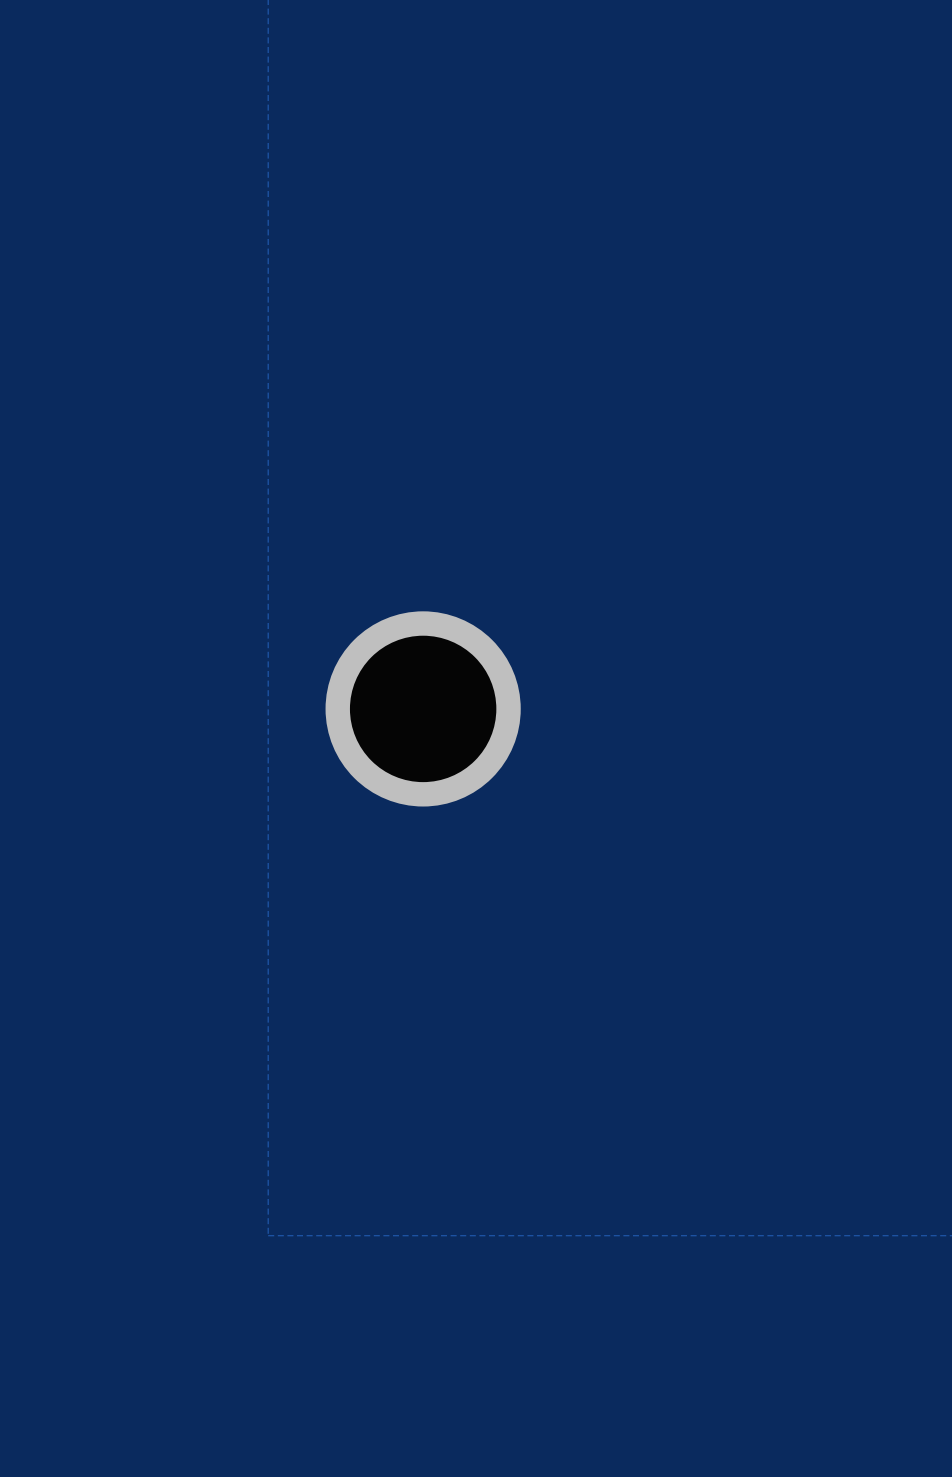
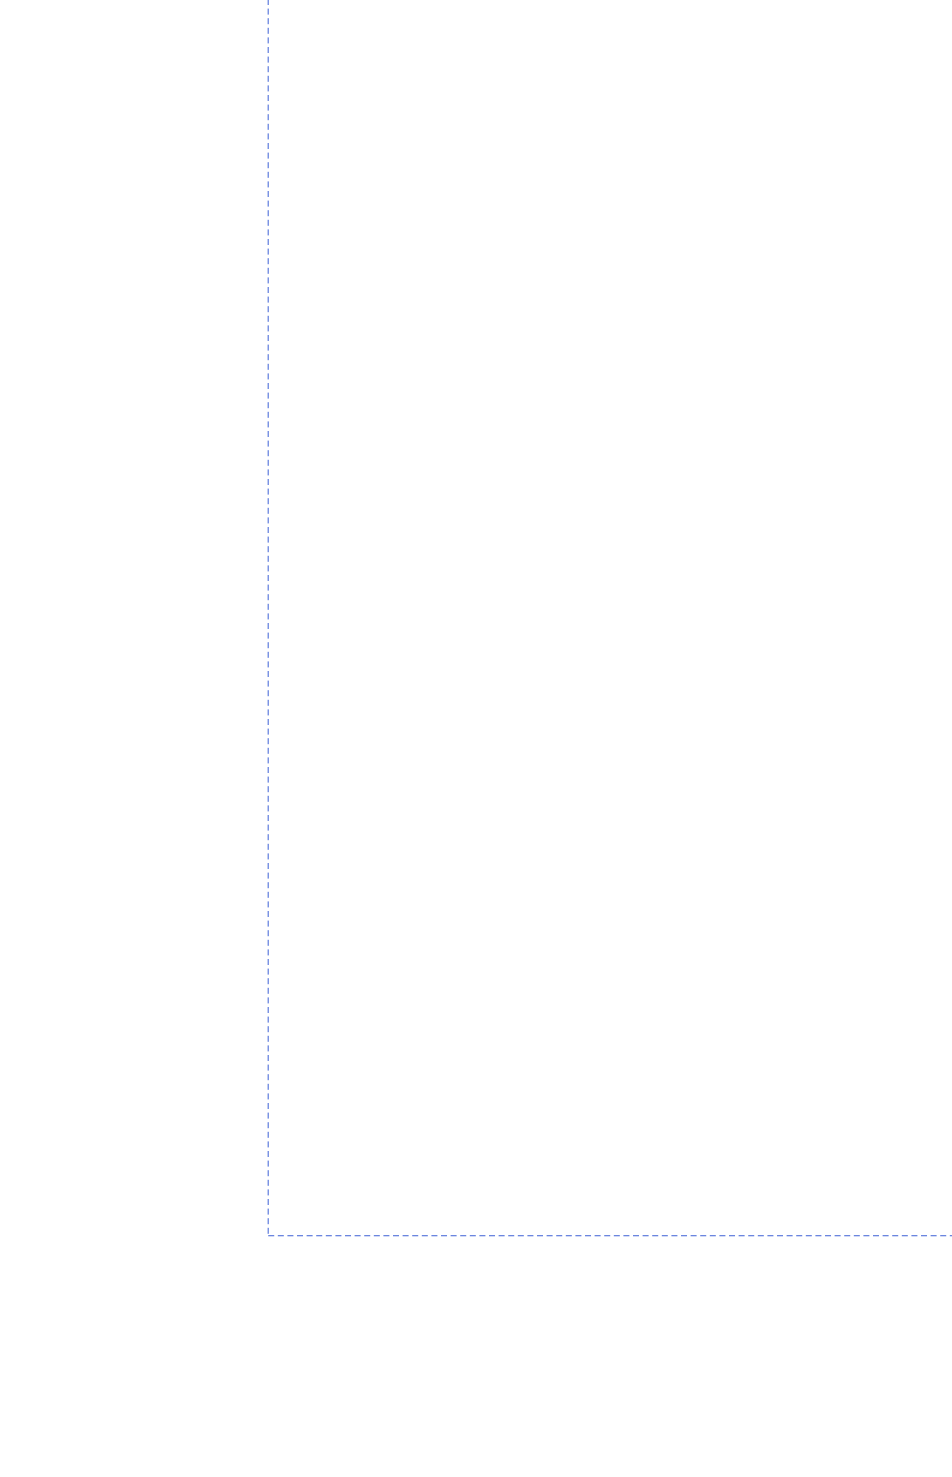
via: (423, 708) -> none

